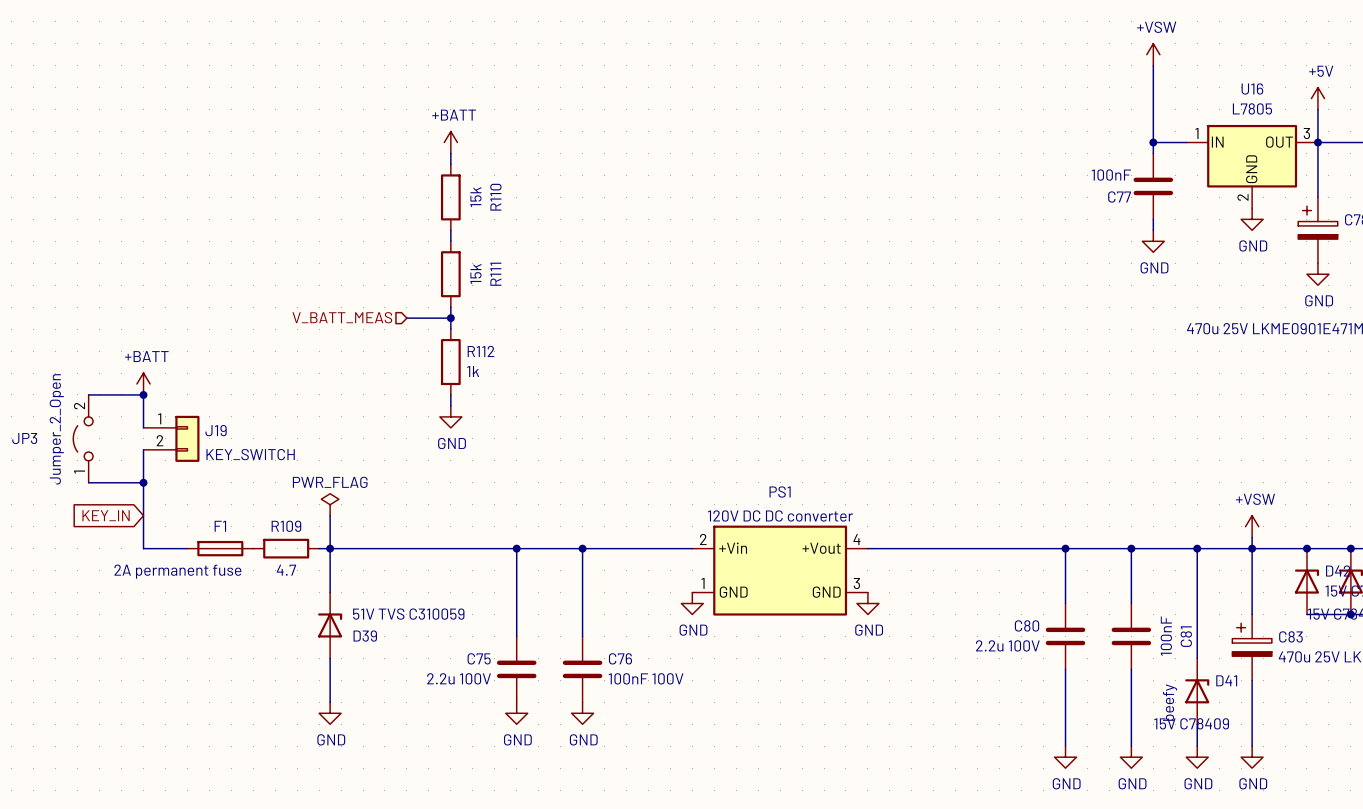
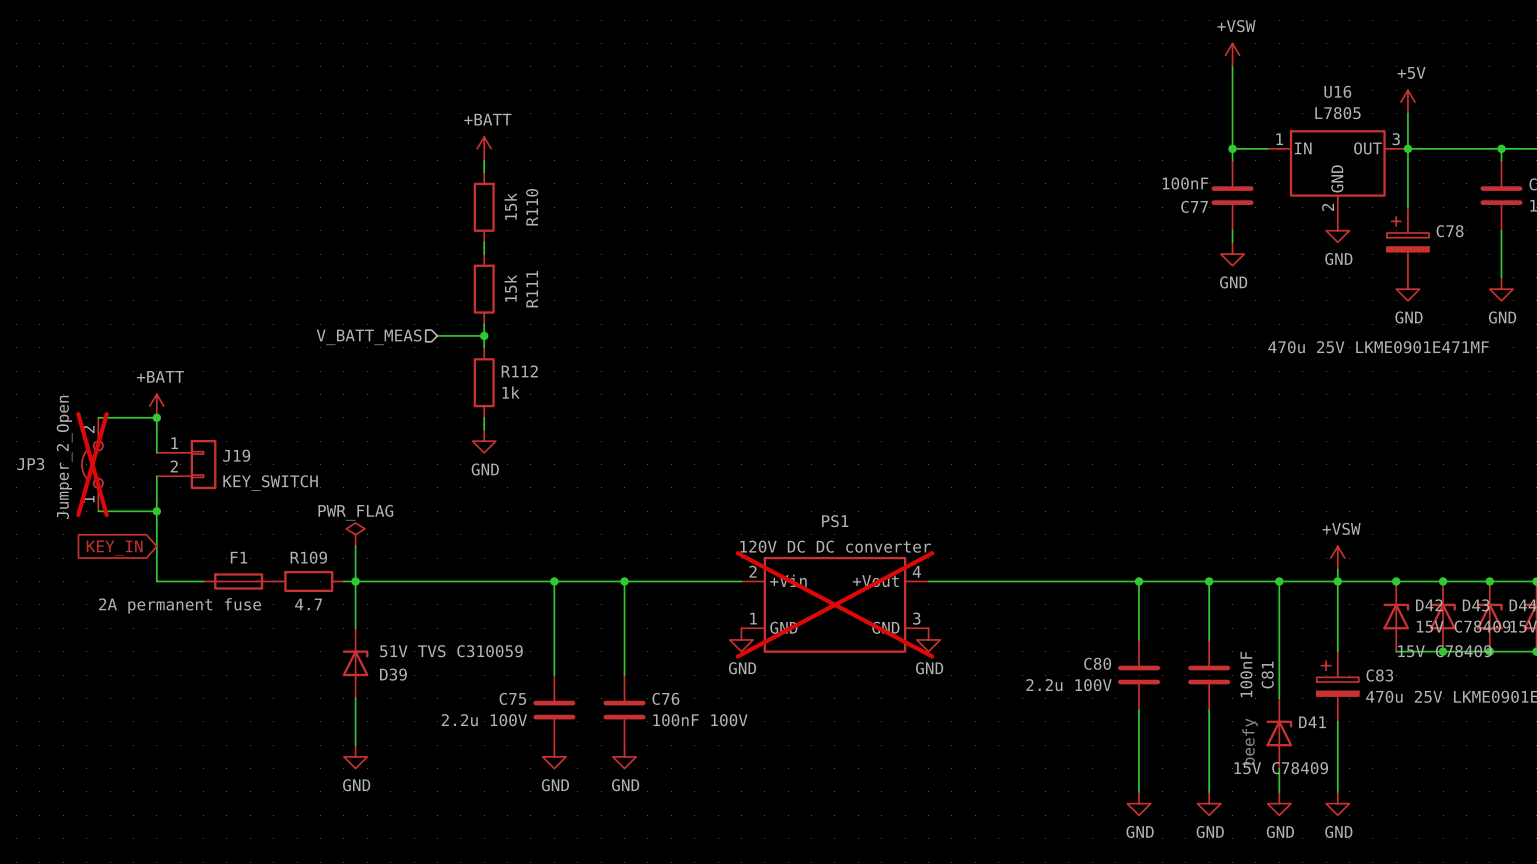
JP3 do-not-place cross: none -> (92, 464)
PS1 do-not-place cross: none -> (834, 604)

